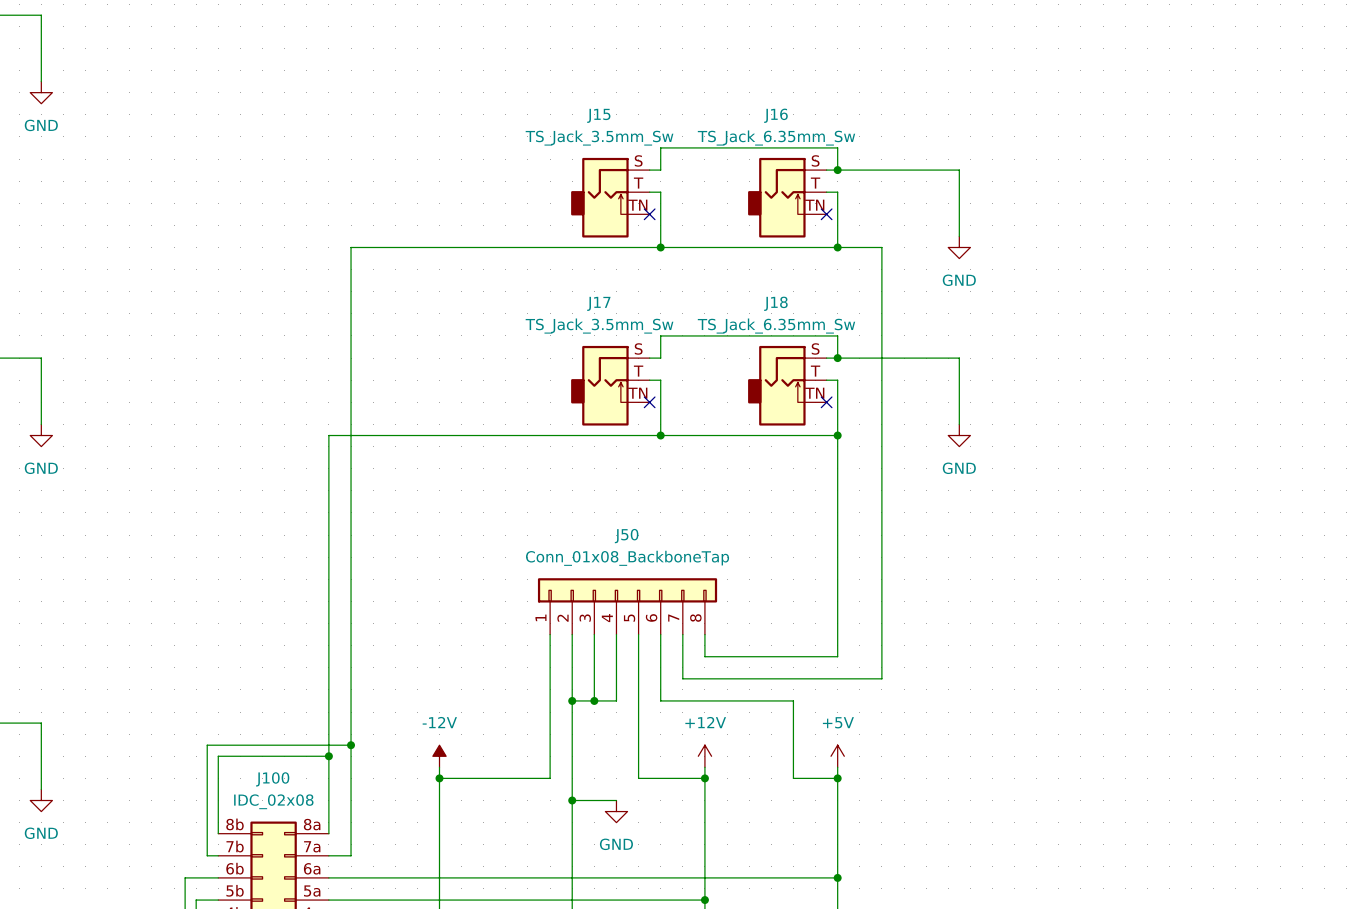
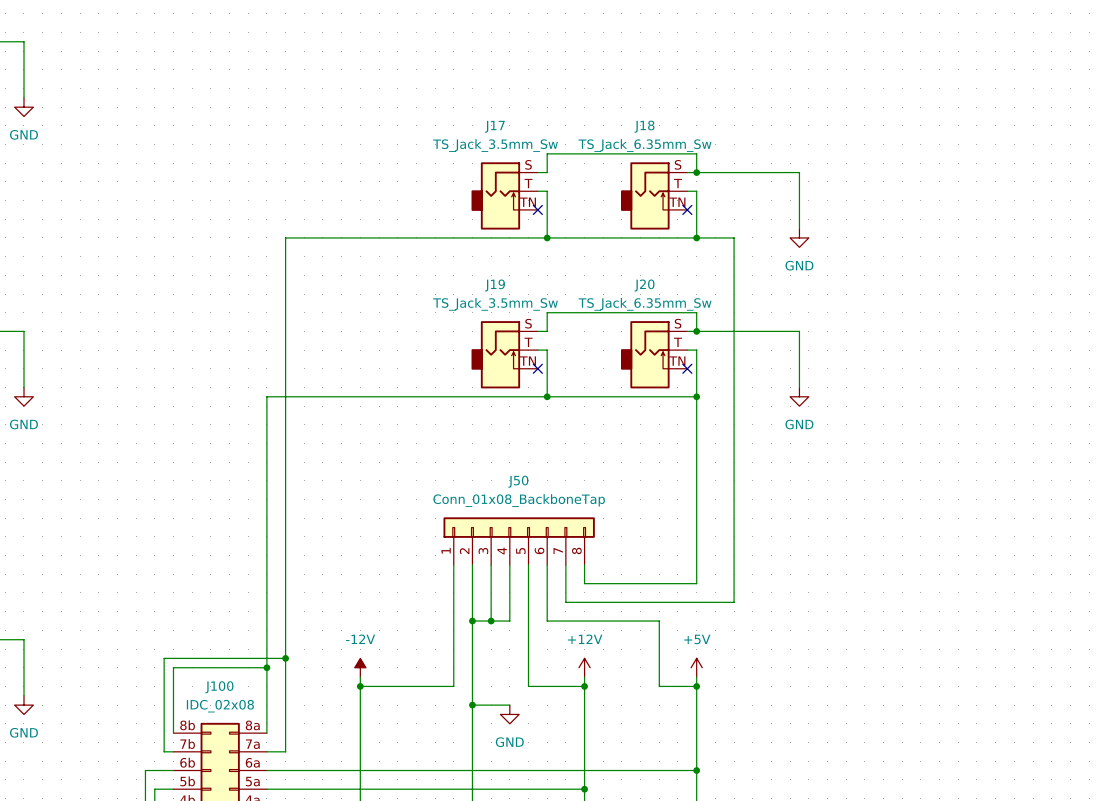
J15 name: J15 (598, 115) -> J17 (494, 126)
J16 name: J16 (775, 115) -> J18 (644, 126)
J17 name: J17 (598, 303) -> J19 (495, 285)
J18 name: J18 (775, 303) -> J20 (644, 285)

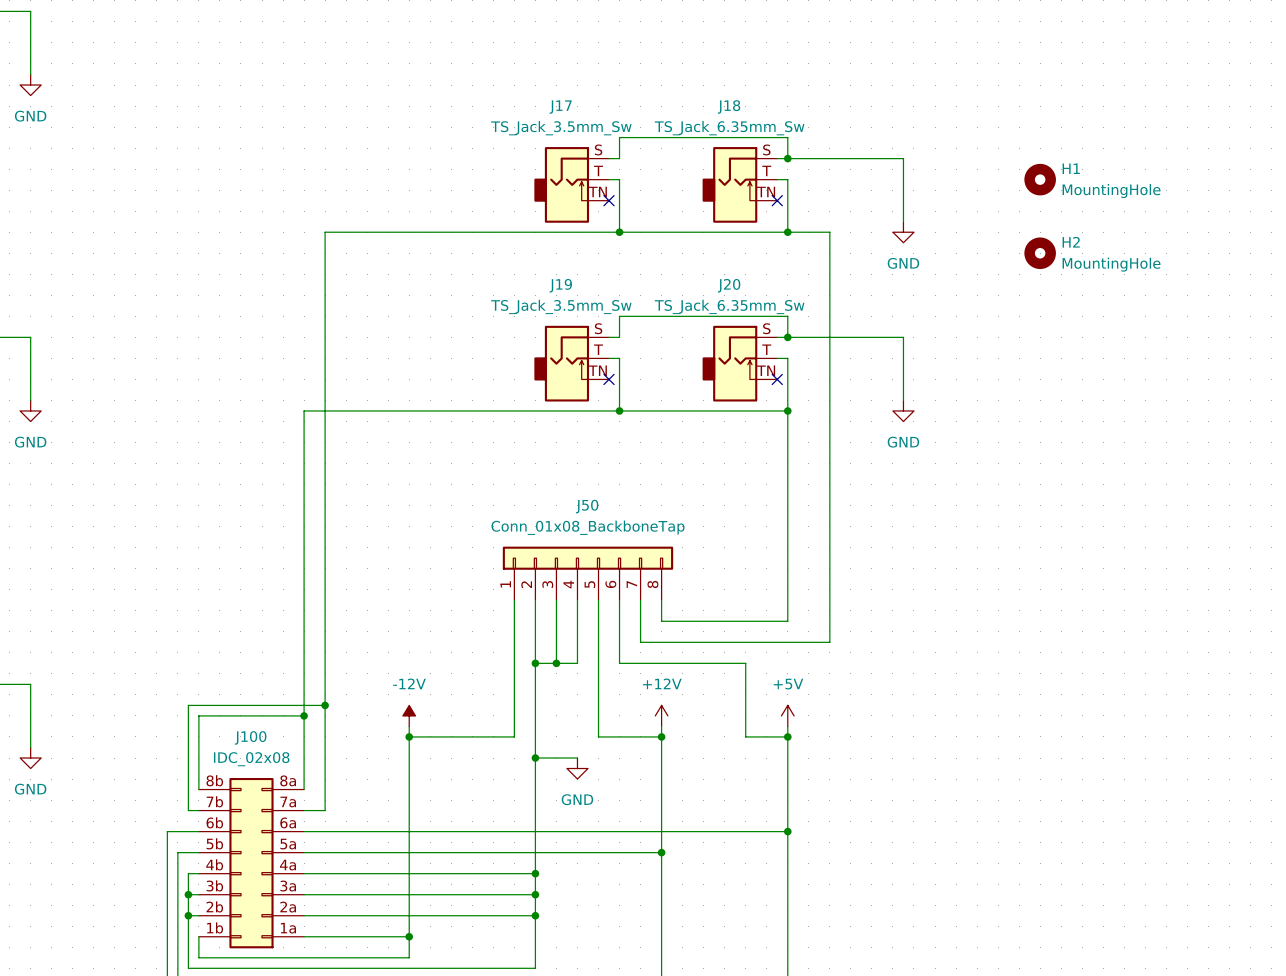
H1: none -> MountingHole (1040, 179)
H2: none -> MountingHole (1040, 253)

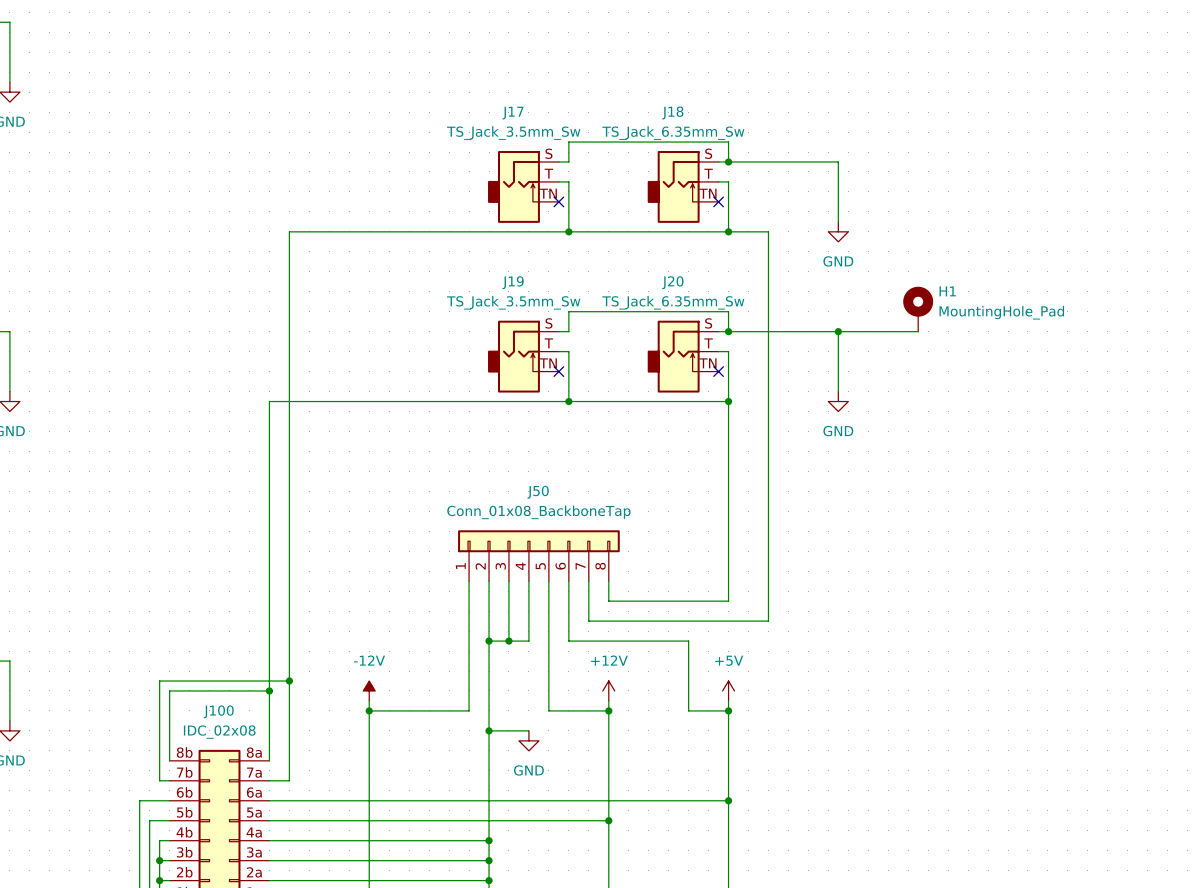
H1 symbol: [1024, 163, 1056, 196] -> [903, 286, 934, 332]
H1 value: MountingHole (1111, 191) -> MountingHole_Pad (1001, 312)
H2: MountingHole (1040, 253) -> none
wire: none -> (838, 331) (918, 331)
junction: none -> (838, 331)

